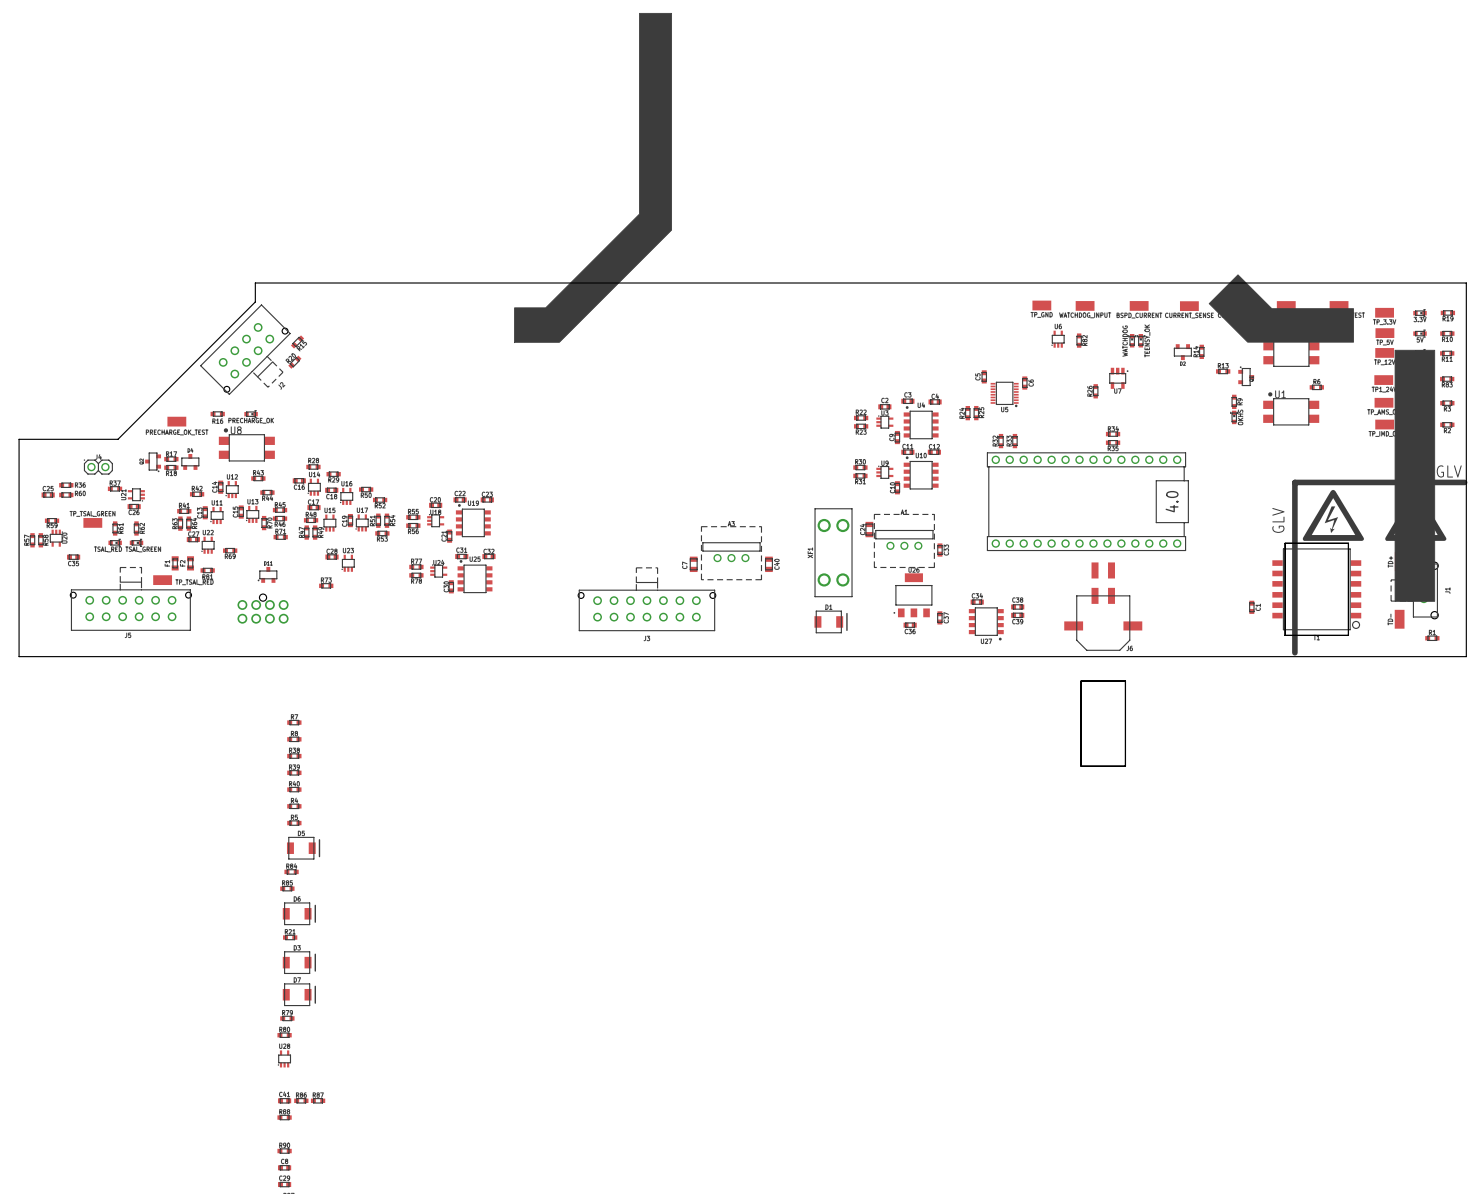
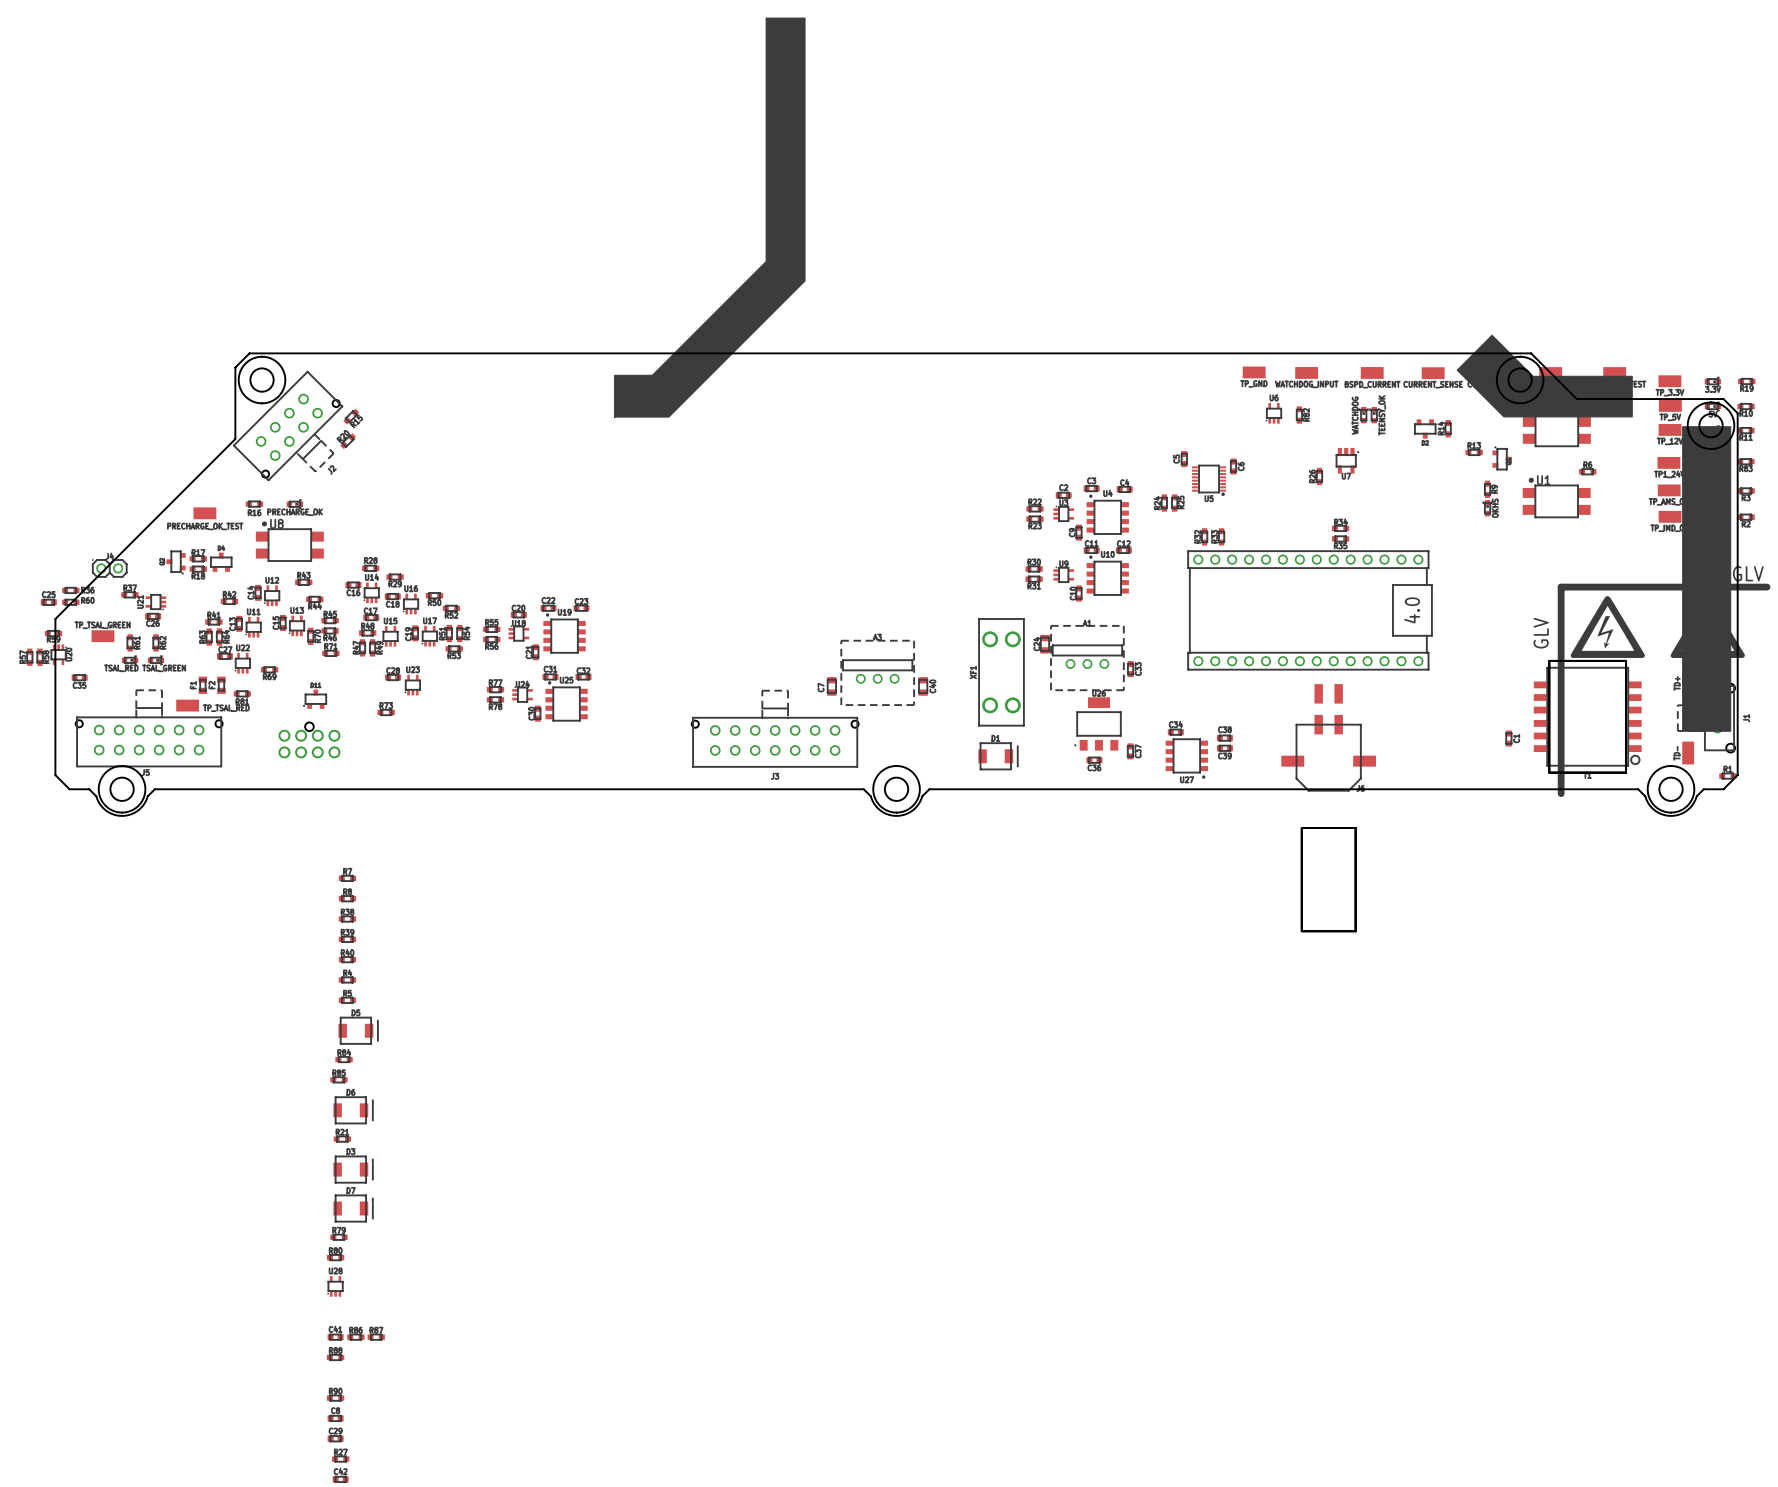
board edge: (255, 283) (1466, 283) (1466, 656) (19, 656) (19, 439) (117, 439) (255, 301) (255, 283) -> (249, 353) (235, 367) (235, 439) (55, 618) (55, 775) (69, 789) (89, 789) (103, 808) (115, 815) (125, 815) (135, 812) (143, 805) (147, 796) (154, 789) (863, 789) (880, 810) (896, 815) (912, 810) (929, 789) (1638, 789) (1654, 810) (1671, 815) (1687, 810) (1703, 789) (1723, 789) (1737, 775) (1737, 413) (1723, 399) (1576, 399) (1531, 353) (249, 353)
board edge: none -> (262, 356) (253, 358) (245, 363) (240, 371) (238, 380) (240, 388) (245, 396) (253, 401) (262, 403) (270, 401) (278, 396) (283, 388) (285, 380) (283, 371) (278, 363) (270, 358) (262, 356)
board edge: none -> (1520, 356) (1511, 358) (1503, 363) (1498, 371) (1496, 380) (1498, 388) (1503, 396) (1511, 401) (1520, 403) (1529, 401) (1536, 396) (1541, 388) (1543, 380) (1541, 371) (1536, 363) (1529, 358) (1520, 356)
round board edge: none -> [249, 367, 275, 393]
round board edge: none -> [1507, 367, 1533, 393]
board edge: none -> (1711, 402) (1702, 404) (1694, 409) (1689, 416) (1687, 425) (1689, 434) (1694, 442) (1702, 447) (1711, 449) (1719, 447) (1727, 442) (1732, 434) (1734, 425) (1732, 416) (1727, 409) (1719, 404) (1711, 402)
round board edge: none -> [1698, 413, 1724, 439]
board edge: none -> (122, 765) (113, 767) (105, 772) (100, 780) (98, 789) (100, 798) (105, 805) (113, 810) (122, 812) (130, 810) (138, 805) (143, 798) (145, 789) (143, 780) (138, 772) (130, 767) (122, 765)
board edge: none -> (896, 765) (887, 767) (880, 772) (874, 780) (873, 789) (874, 798) (880, 805) (887, 810) (896, 812) (905, 810) (913, 805) (918, 798) (919, 789) (918, 780) (913, 772) (905, 767) (896, 765)
board edge: none -> (1671, 765) (1662, 767) (1654, 772) (1649, 780) (1647, 789) (1649, 798) (1654, 805) (1662, 810) (1671, 812) (1679, 810) (1687, 805) (1692, 798) (1694, 789) (1692, 780) (1687, 772) (1679, 767) (1671, 765)
round board edge: none -> [109, 776, 135, 802]
round board edge: none -> [884, 776, 910, 802]
round board edge: none -> [1658, 776, 1684, 802]

